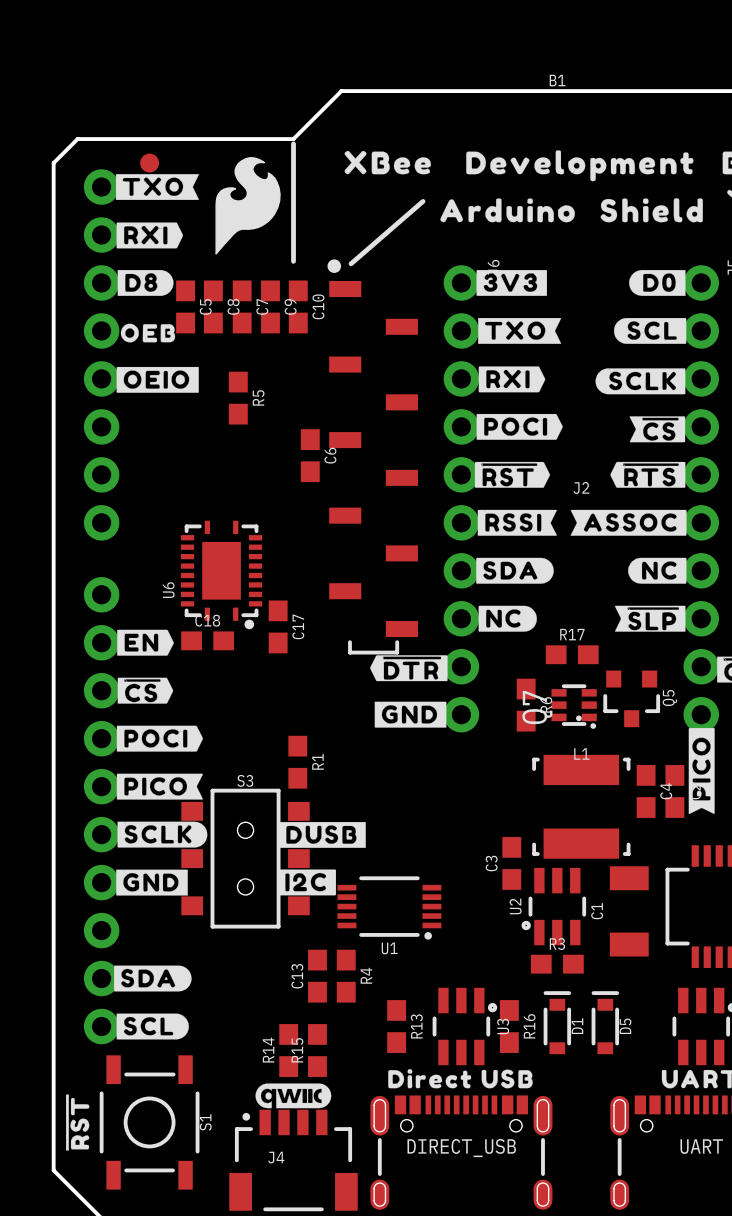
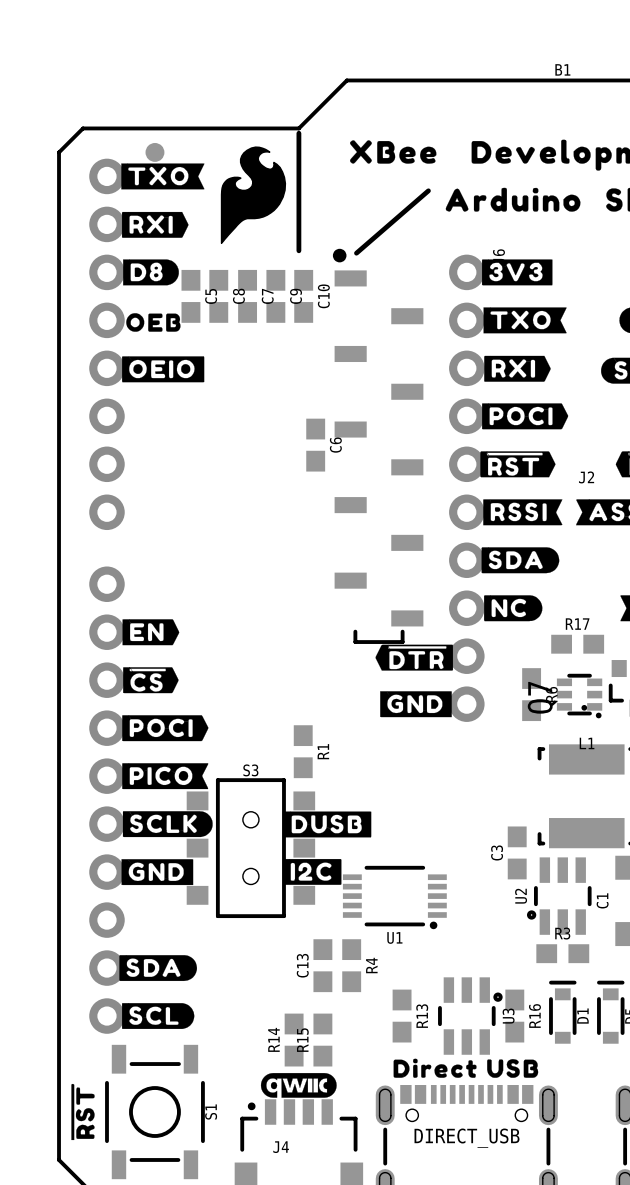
R5: (238, 398) -> none
U6: (221, 574) -> none
C17: (278, 626) -> none
C18: (207, 640) -> none

